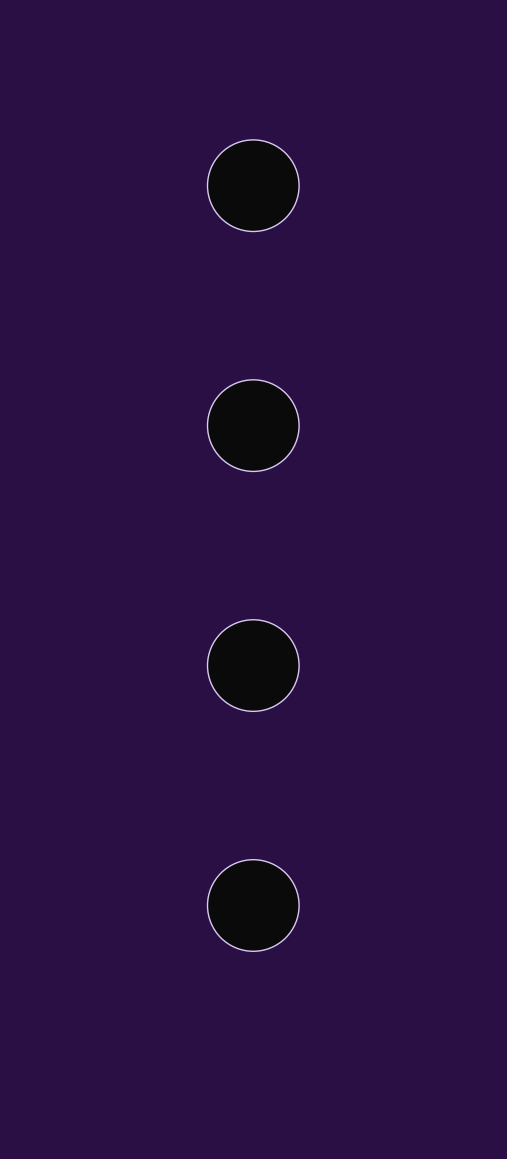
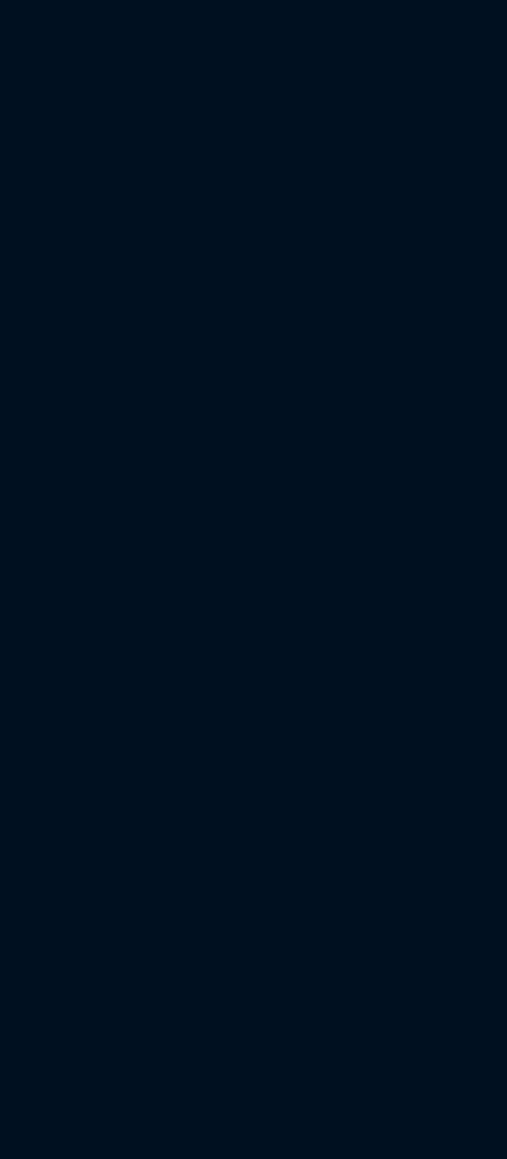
part: (253, 185) -> none
part: (253, 425) -> none
part: (253, 665) -> none
part: (253, 905) -> none

